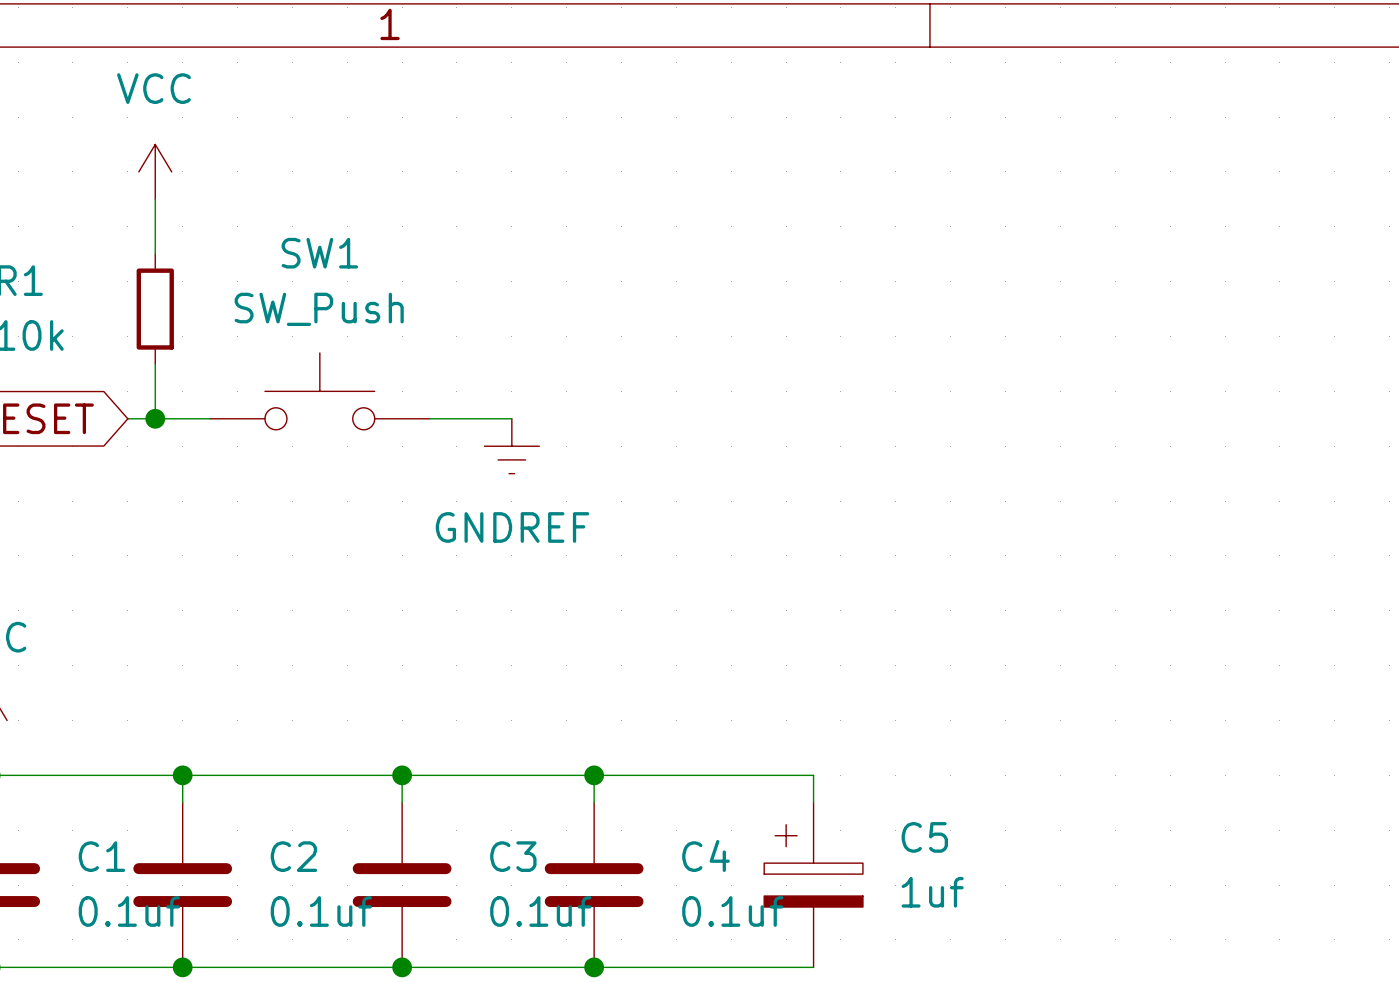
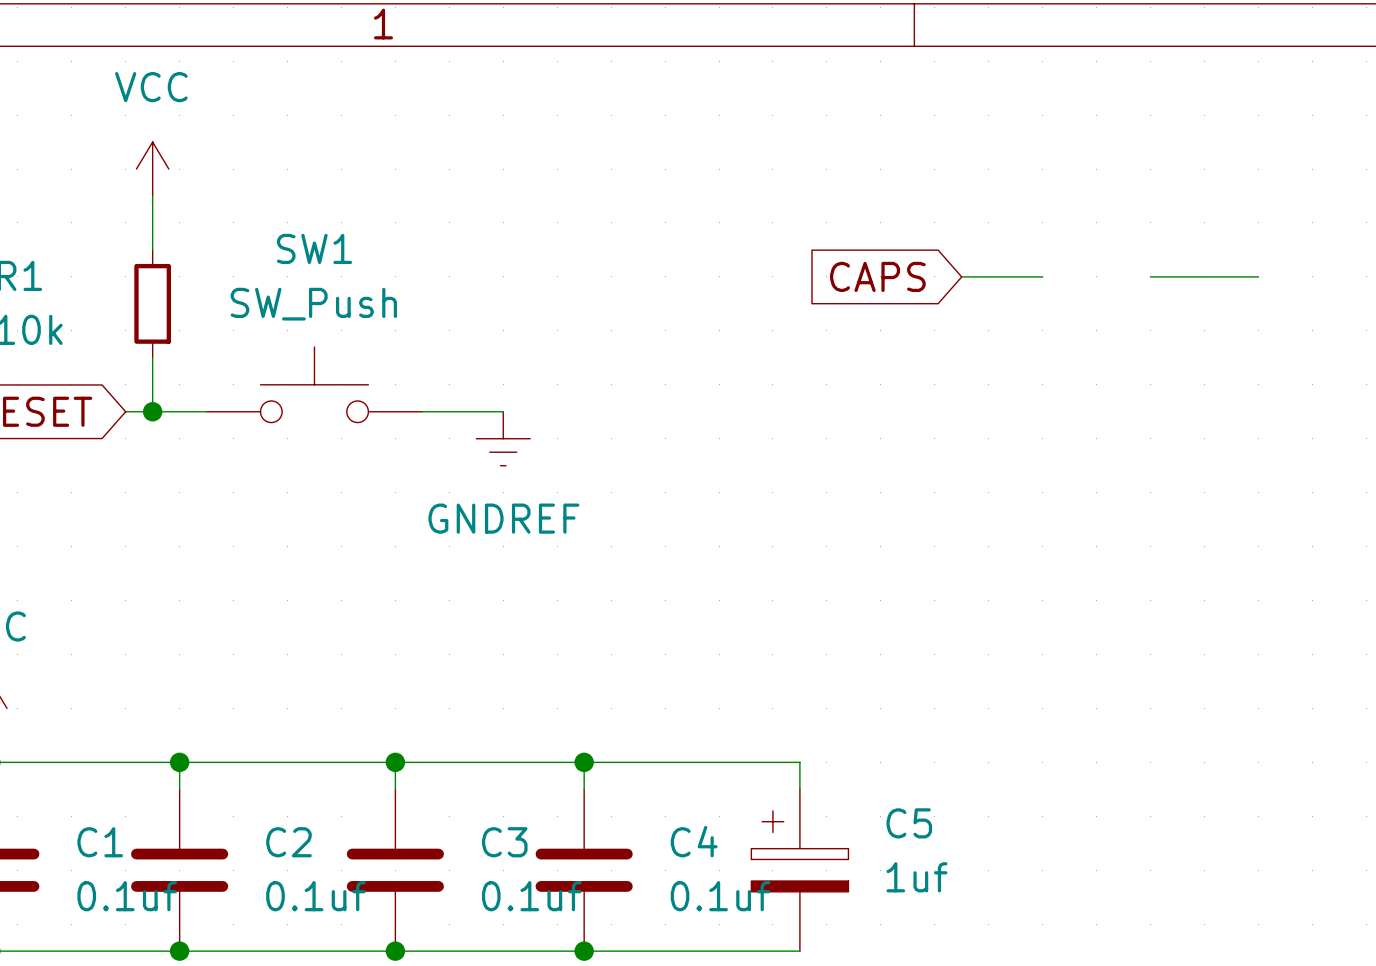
global label: none -> CAPS (877, 276)
wire: none -> (961, 276) (1042, 276)
wire: none -> (1150, 276) (1258, 276)

